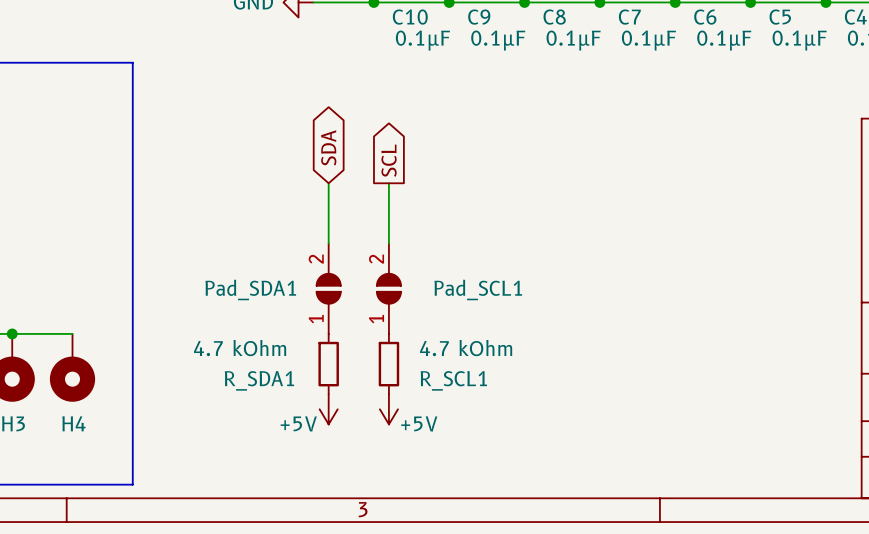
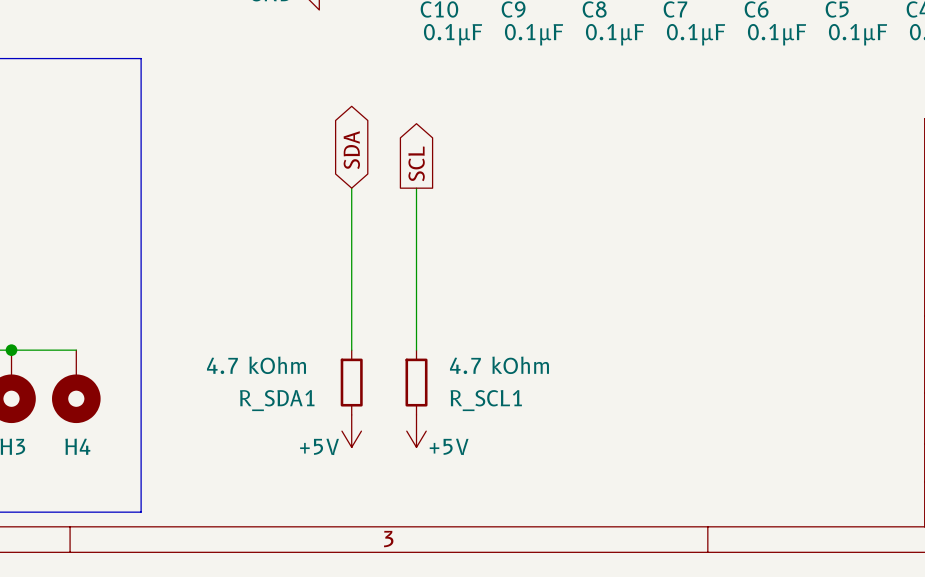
Pad_SDA1: (328, 288) -> none
Pad_SCL1: (388, 288) -> none

